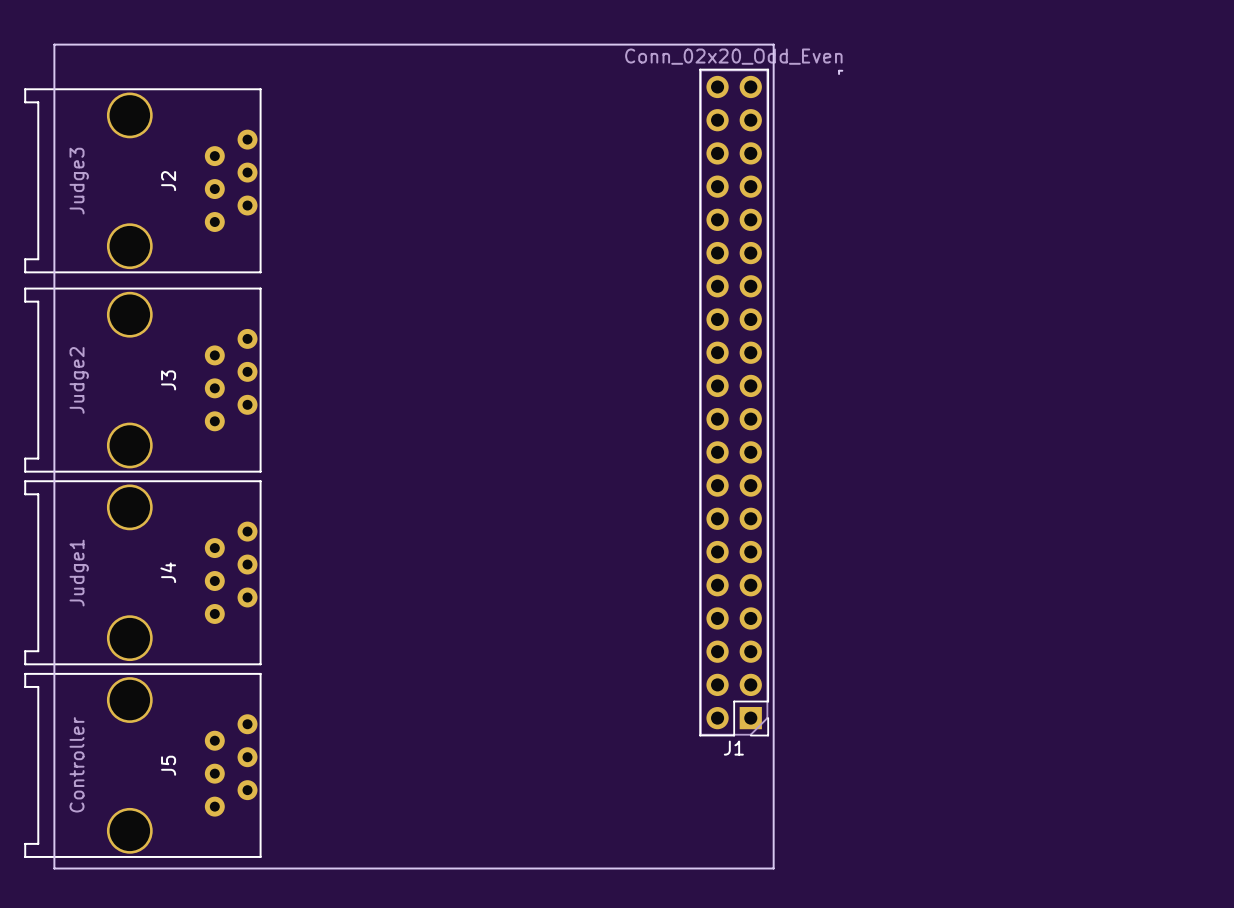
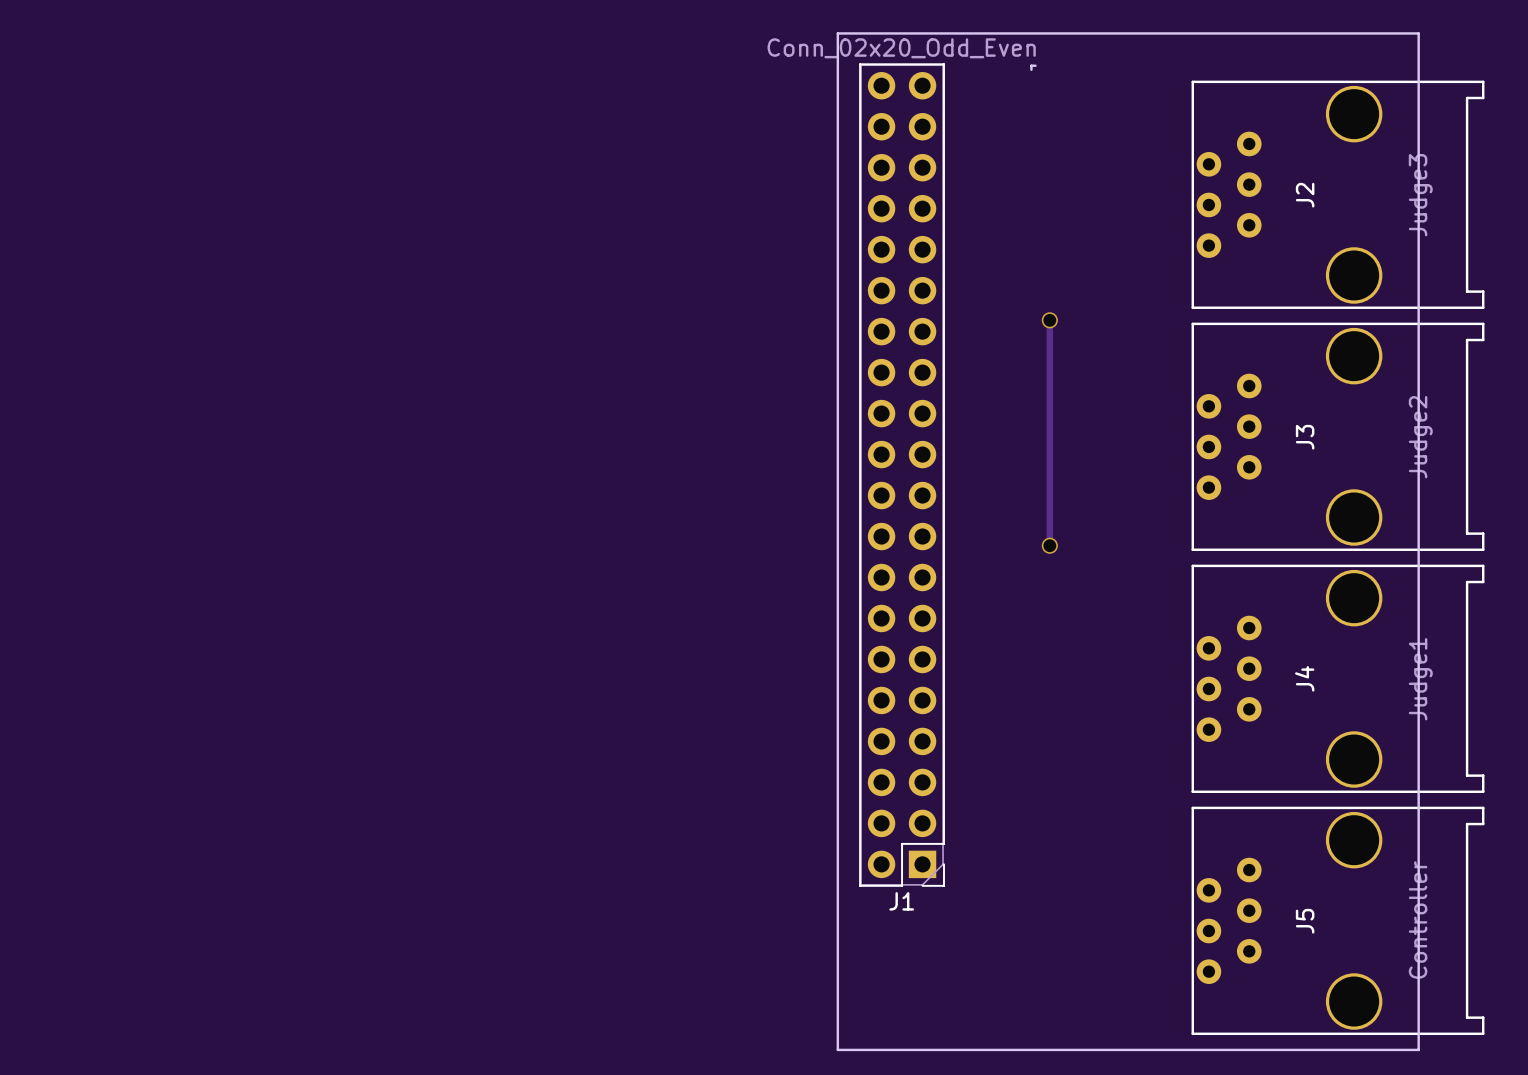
board edge: (682, 44) (54, 44) (54, 868) (682, 868) -> (837, 33) (837, 1049)
board edge: (773, 44) (773, 868) -> (950, 33) (1418, 33) (1418, 1049) (950, 1049)
J2 rotation: 0° (142, 180) -> 180° (1338, 194)
J2 position: (142, 180) -> (1338, 194)
track: none -> (1049, 320) (1049, 545)
via: none -> (1049, 320)
J3 rotation: 0° (142, 380) -> 180° (1338, 436)
J3 position: (142, 380) -> (1338, 436)
via: none -> (1049, 545)
J4 rotation: 0° (142, 572) -> 180° (1338, 678)
J4 position: (142, 572) -> (1338, 678)
J5 rotation: 0° (142, 765) -> 180° (1338, 920)
J5 position: (142, 765) -> (1338, 920)

